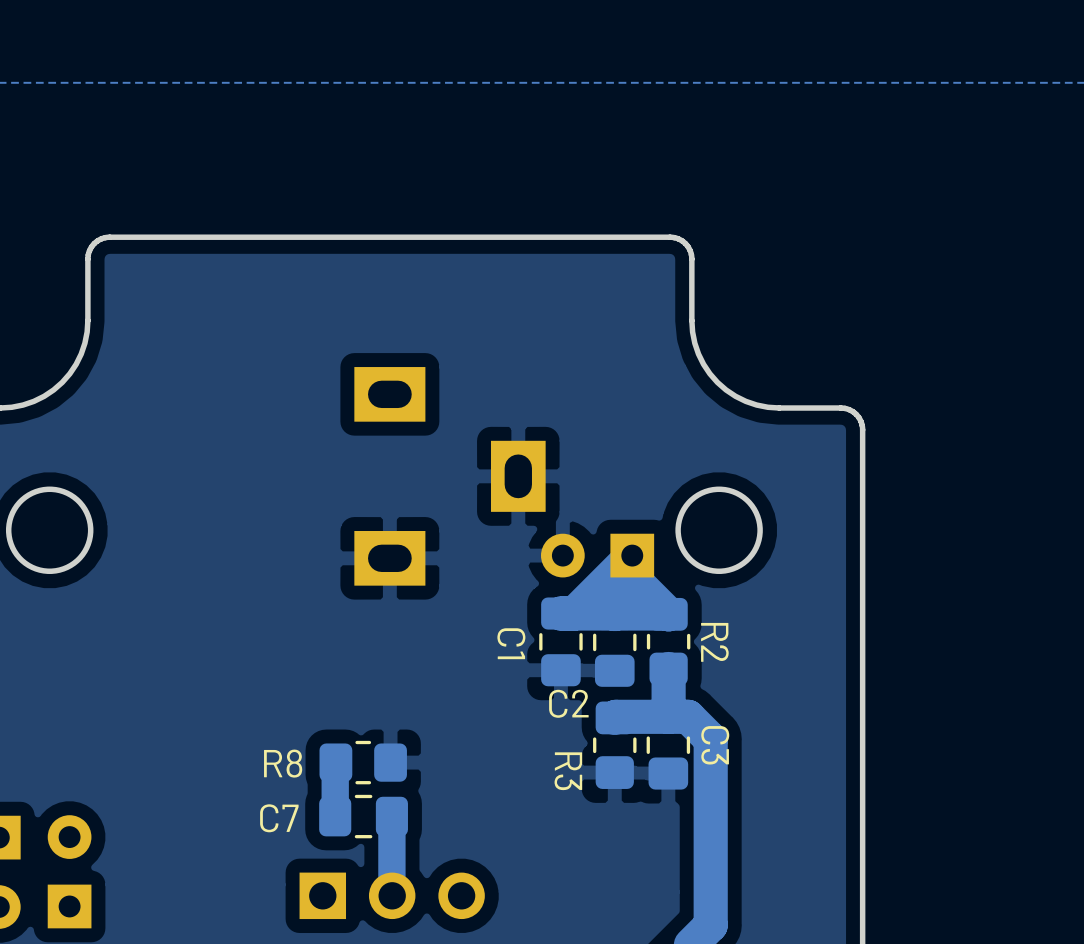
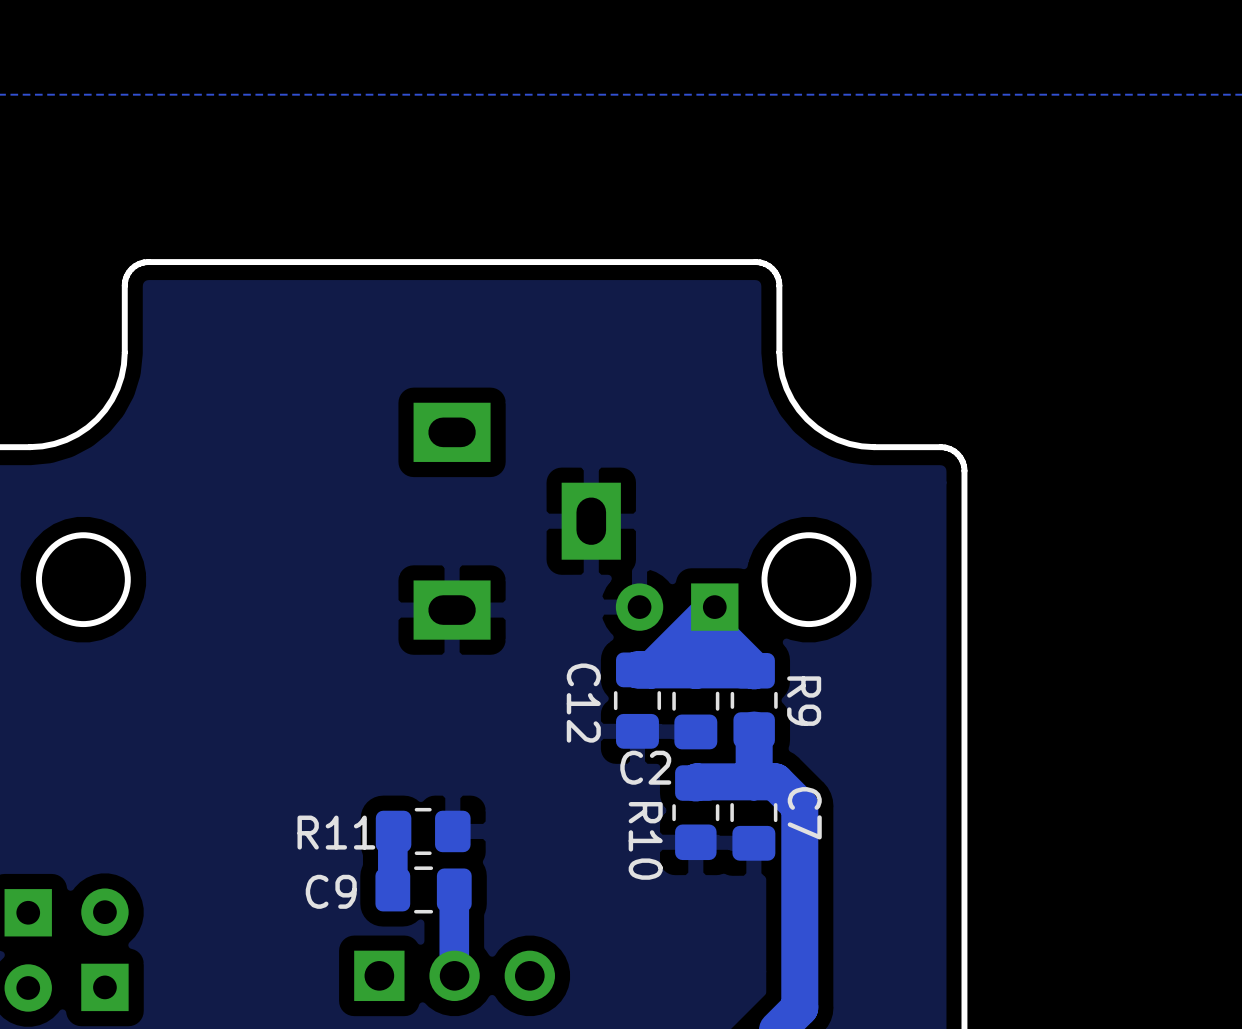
R2 name: R2 (714, 642) -> R9 (804, 701)
C1 name: C1 (511, 643) -> C12 (583, 703)
C3 name: C3 (715, 745) -> C7 (804, 813)
R8 name: R8 (283, 763) -> R11 (336, 832)
R3 name: R3 (568, 771) -> R10 (645, 840)
C7 name: C7 (279, 818) -> C9 (331, 891)

